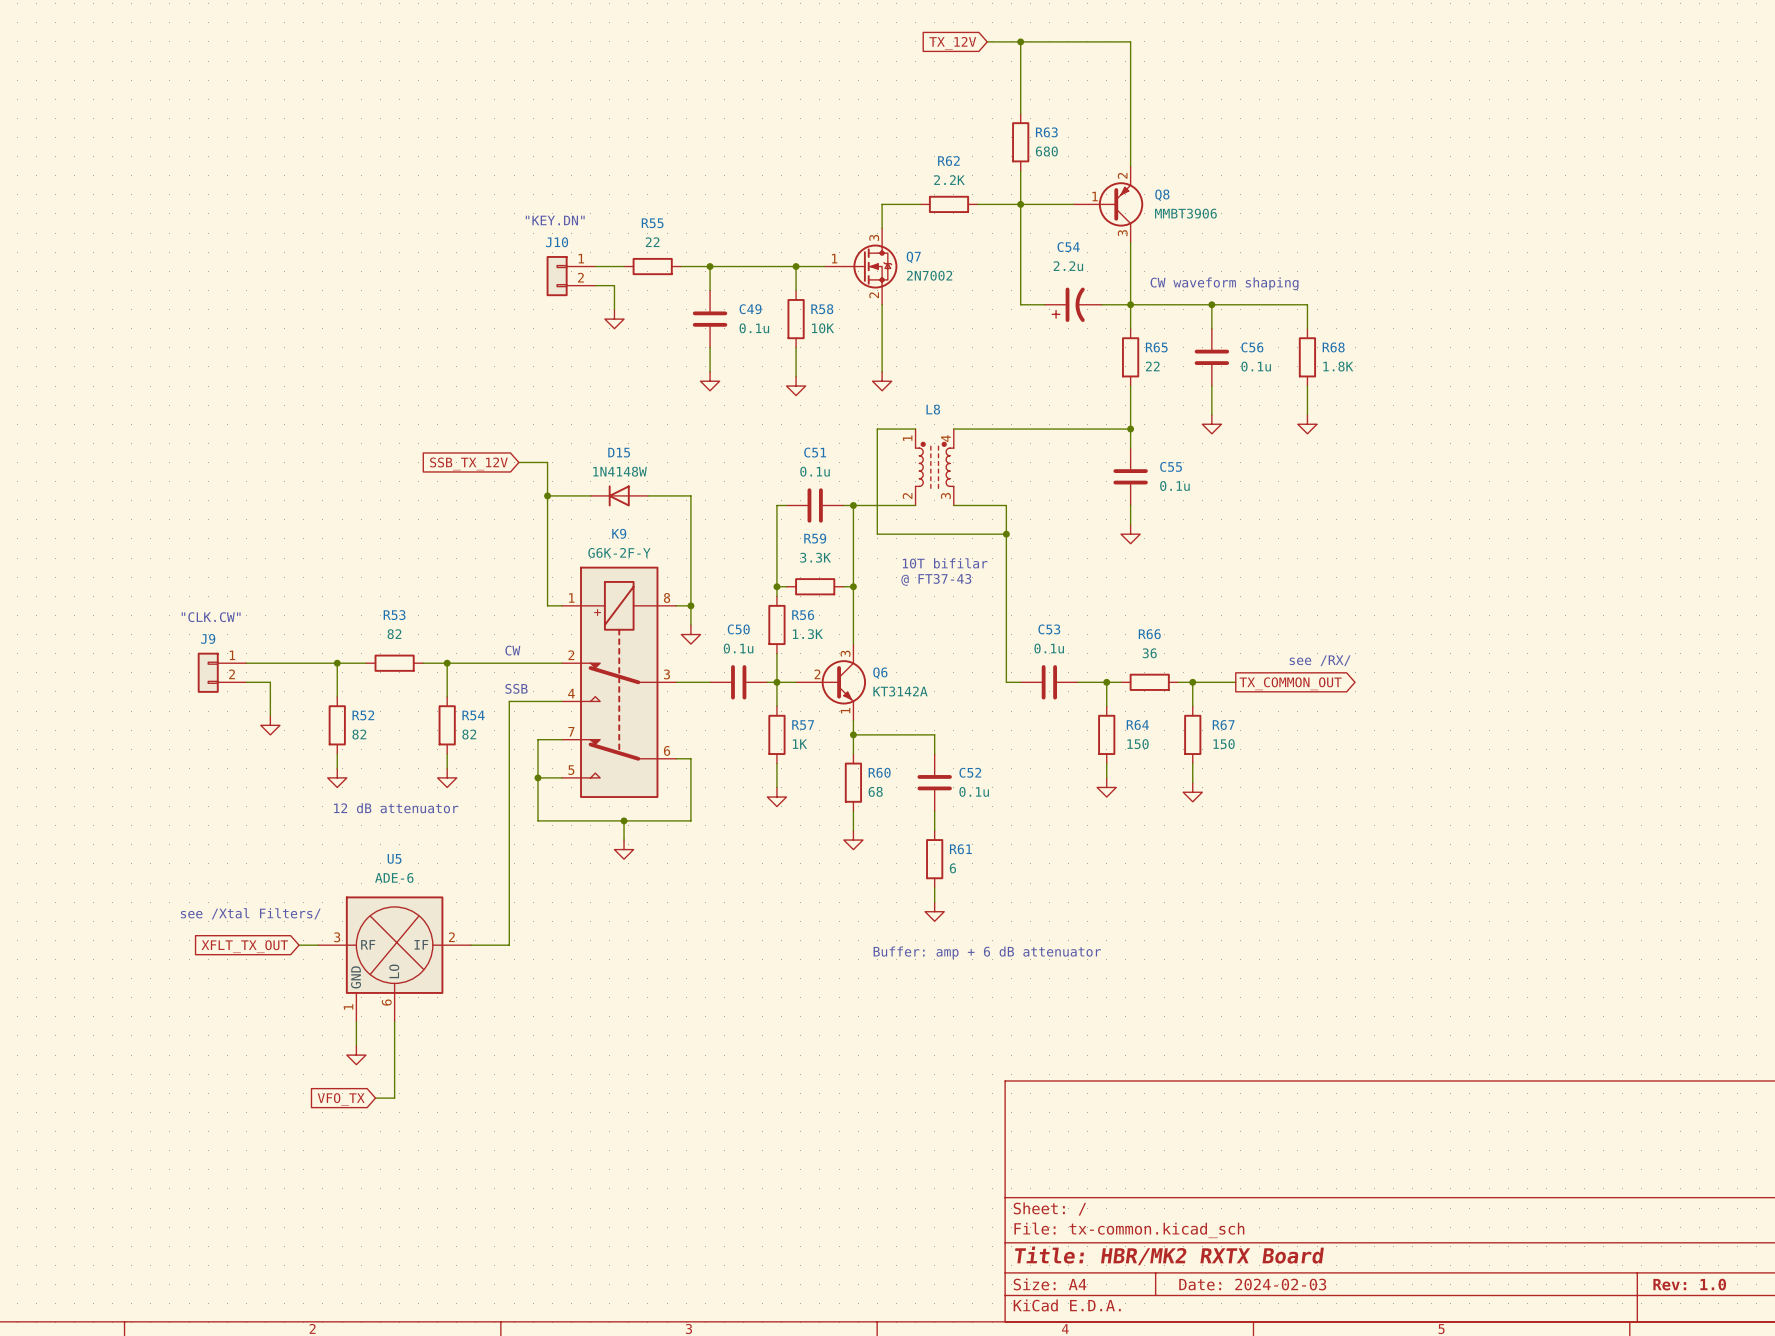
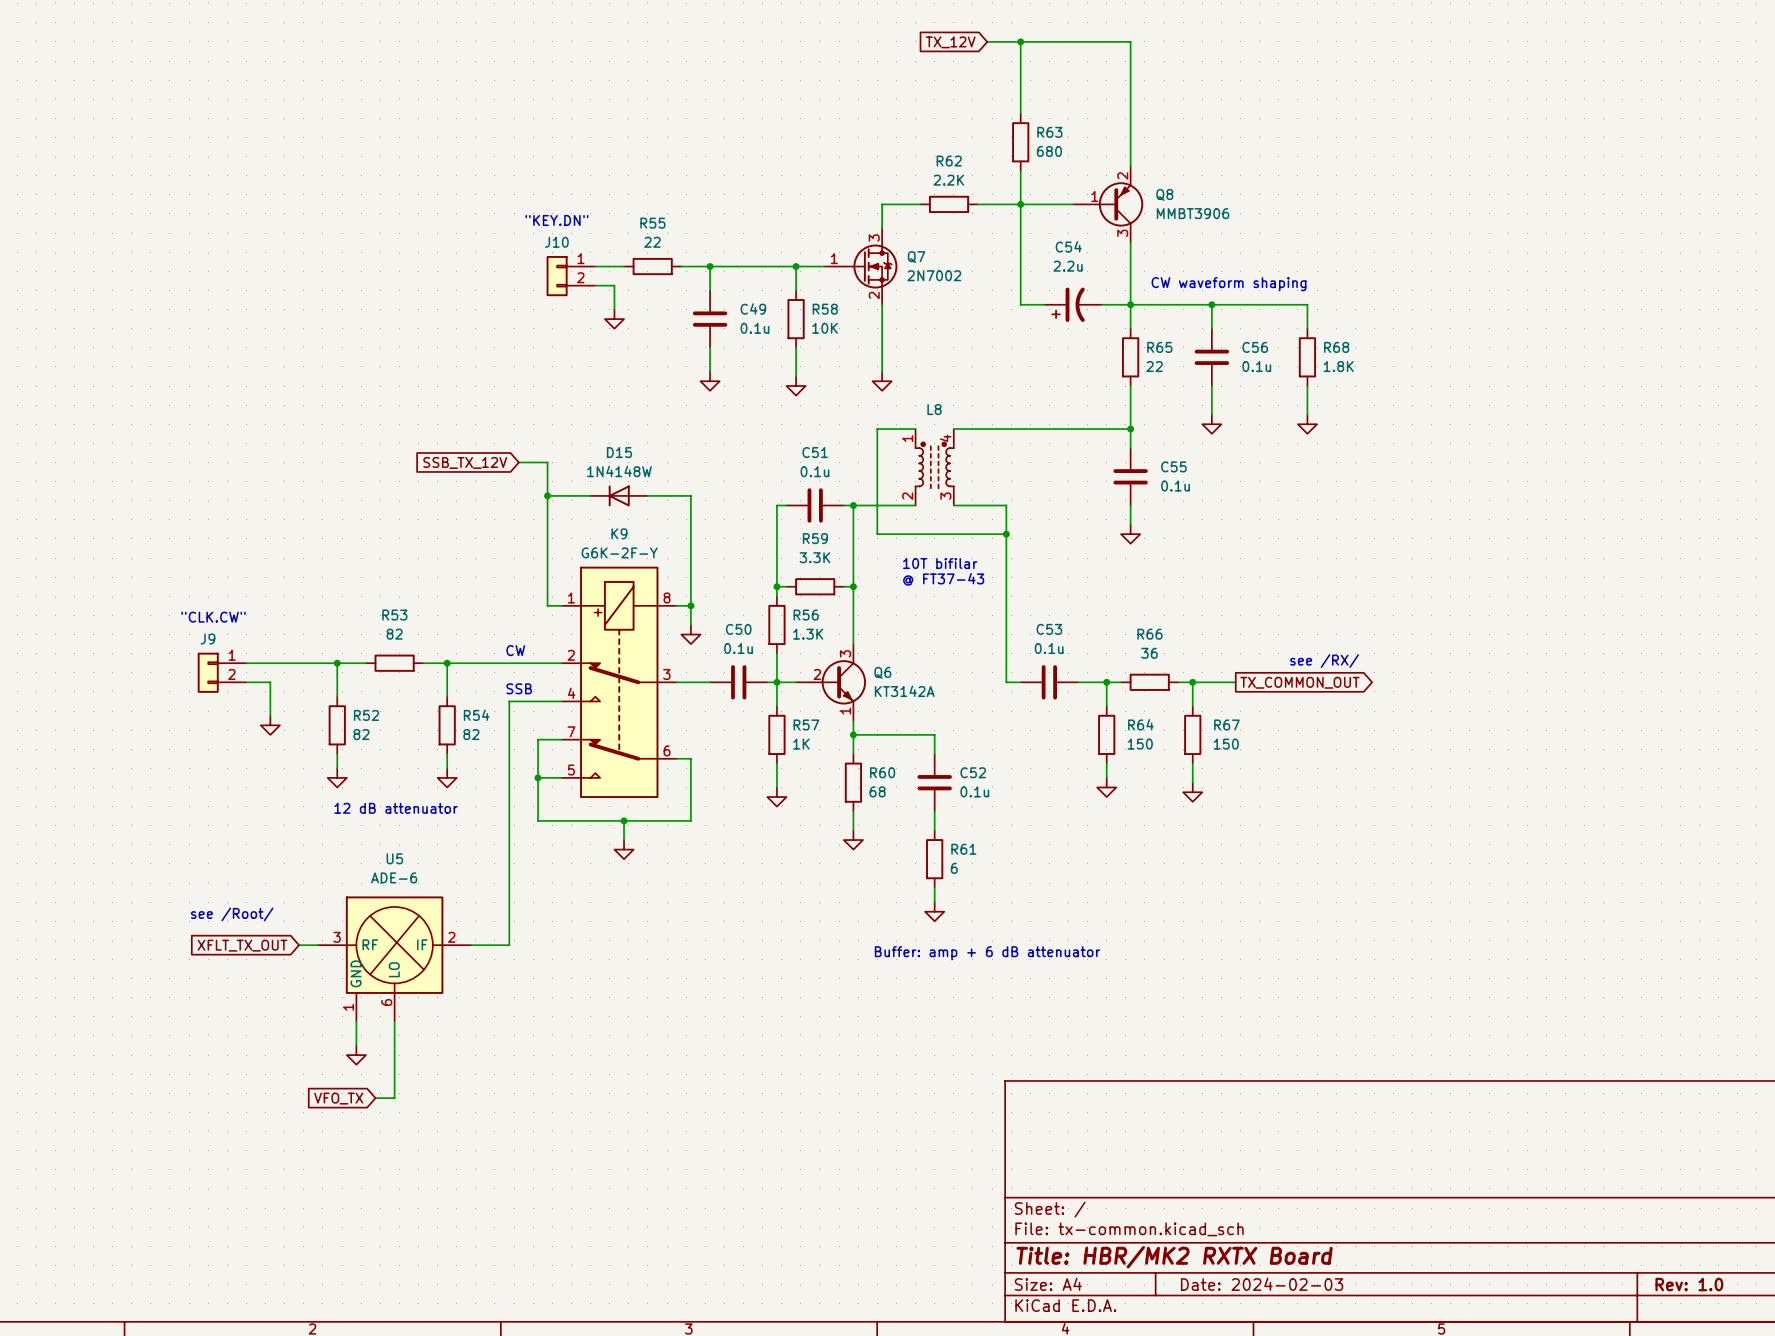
text: see /Xtal Filters/ (250, 913) -> none
text: none -> see /Root/ (232, 914)

